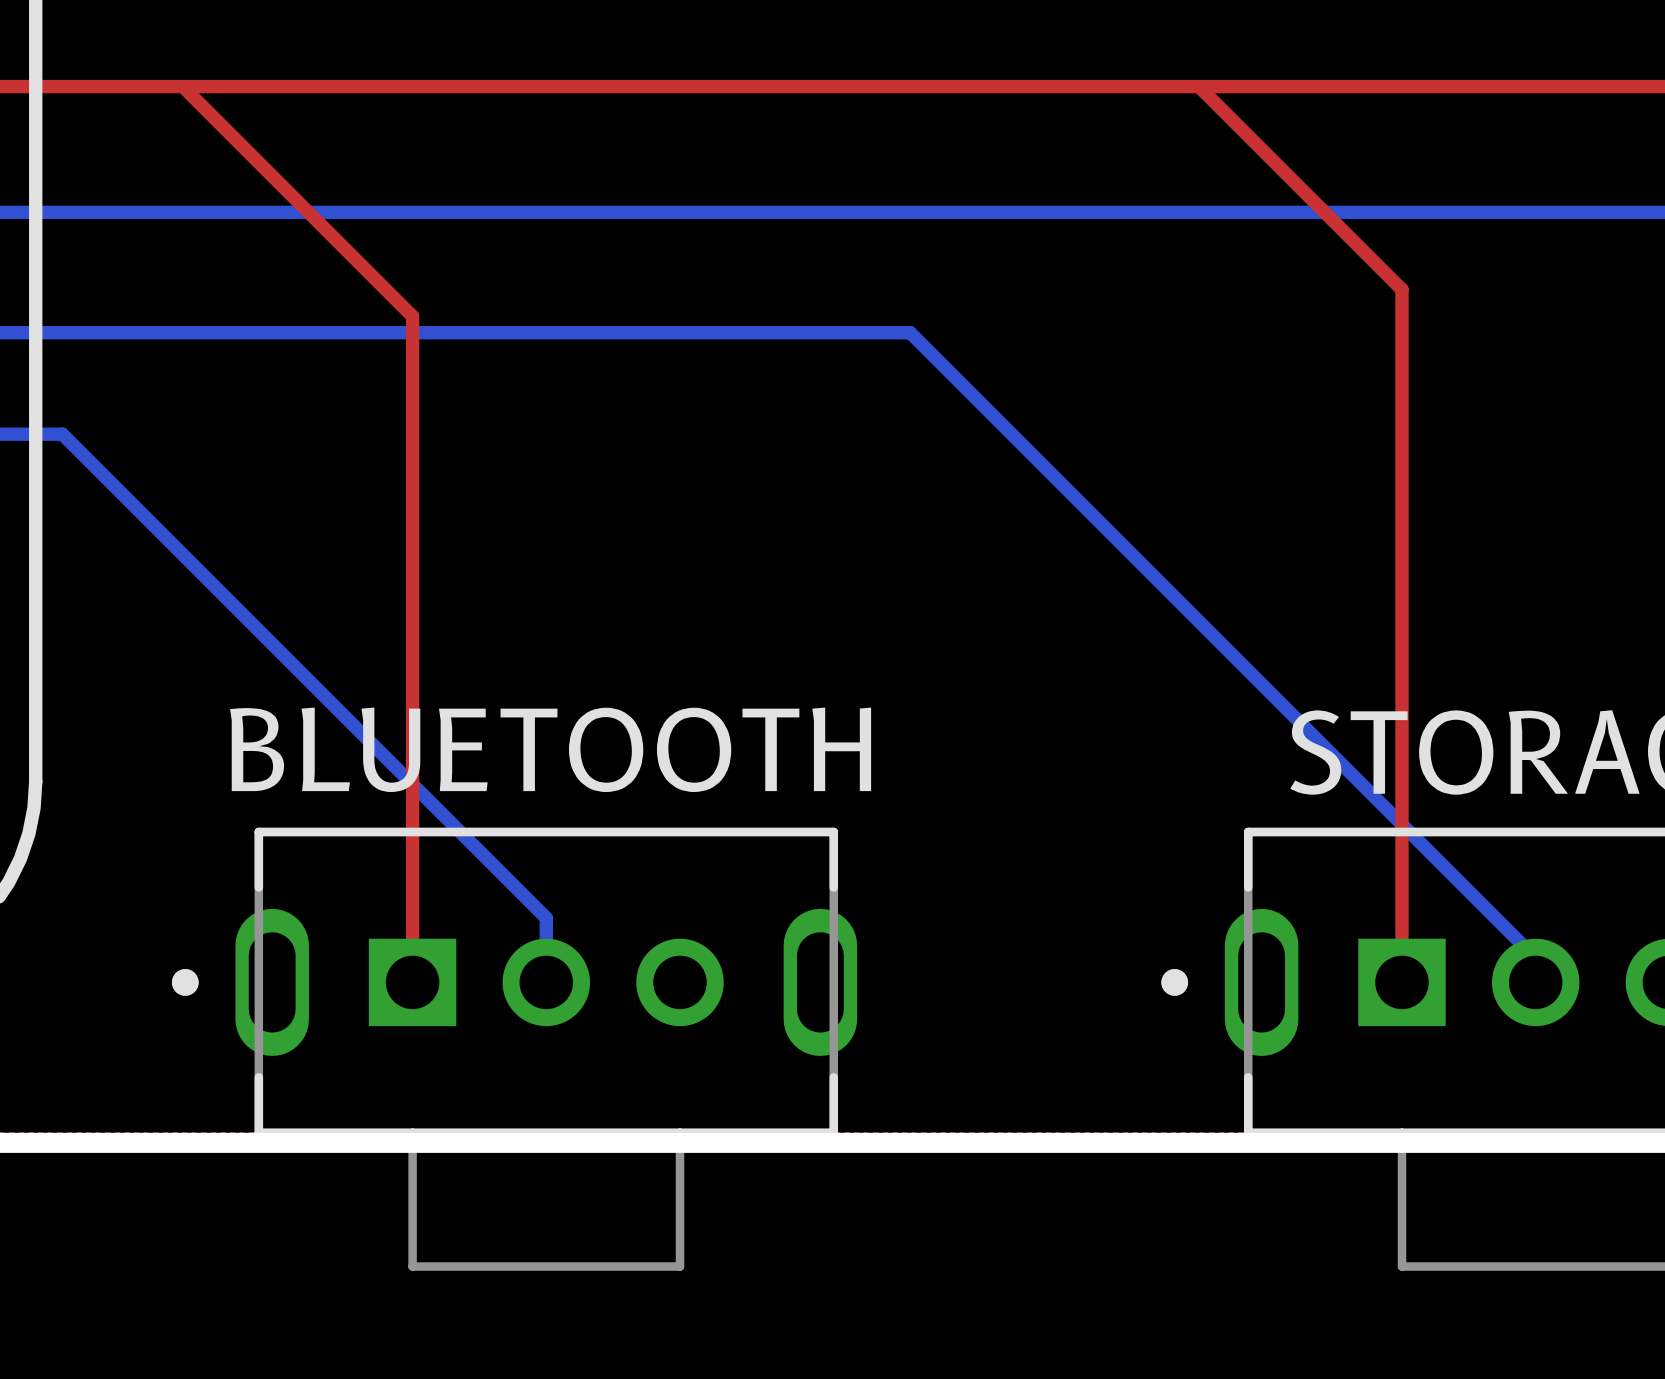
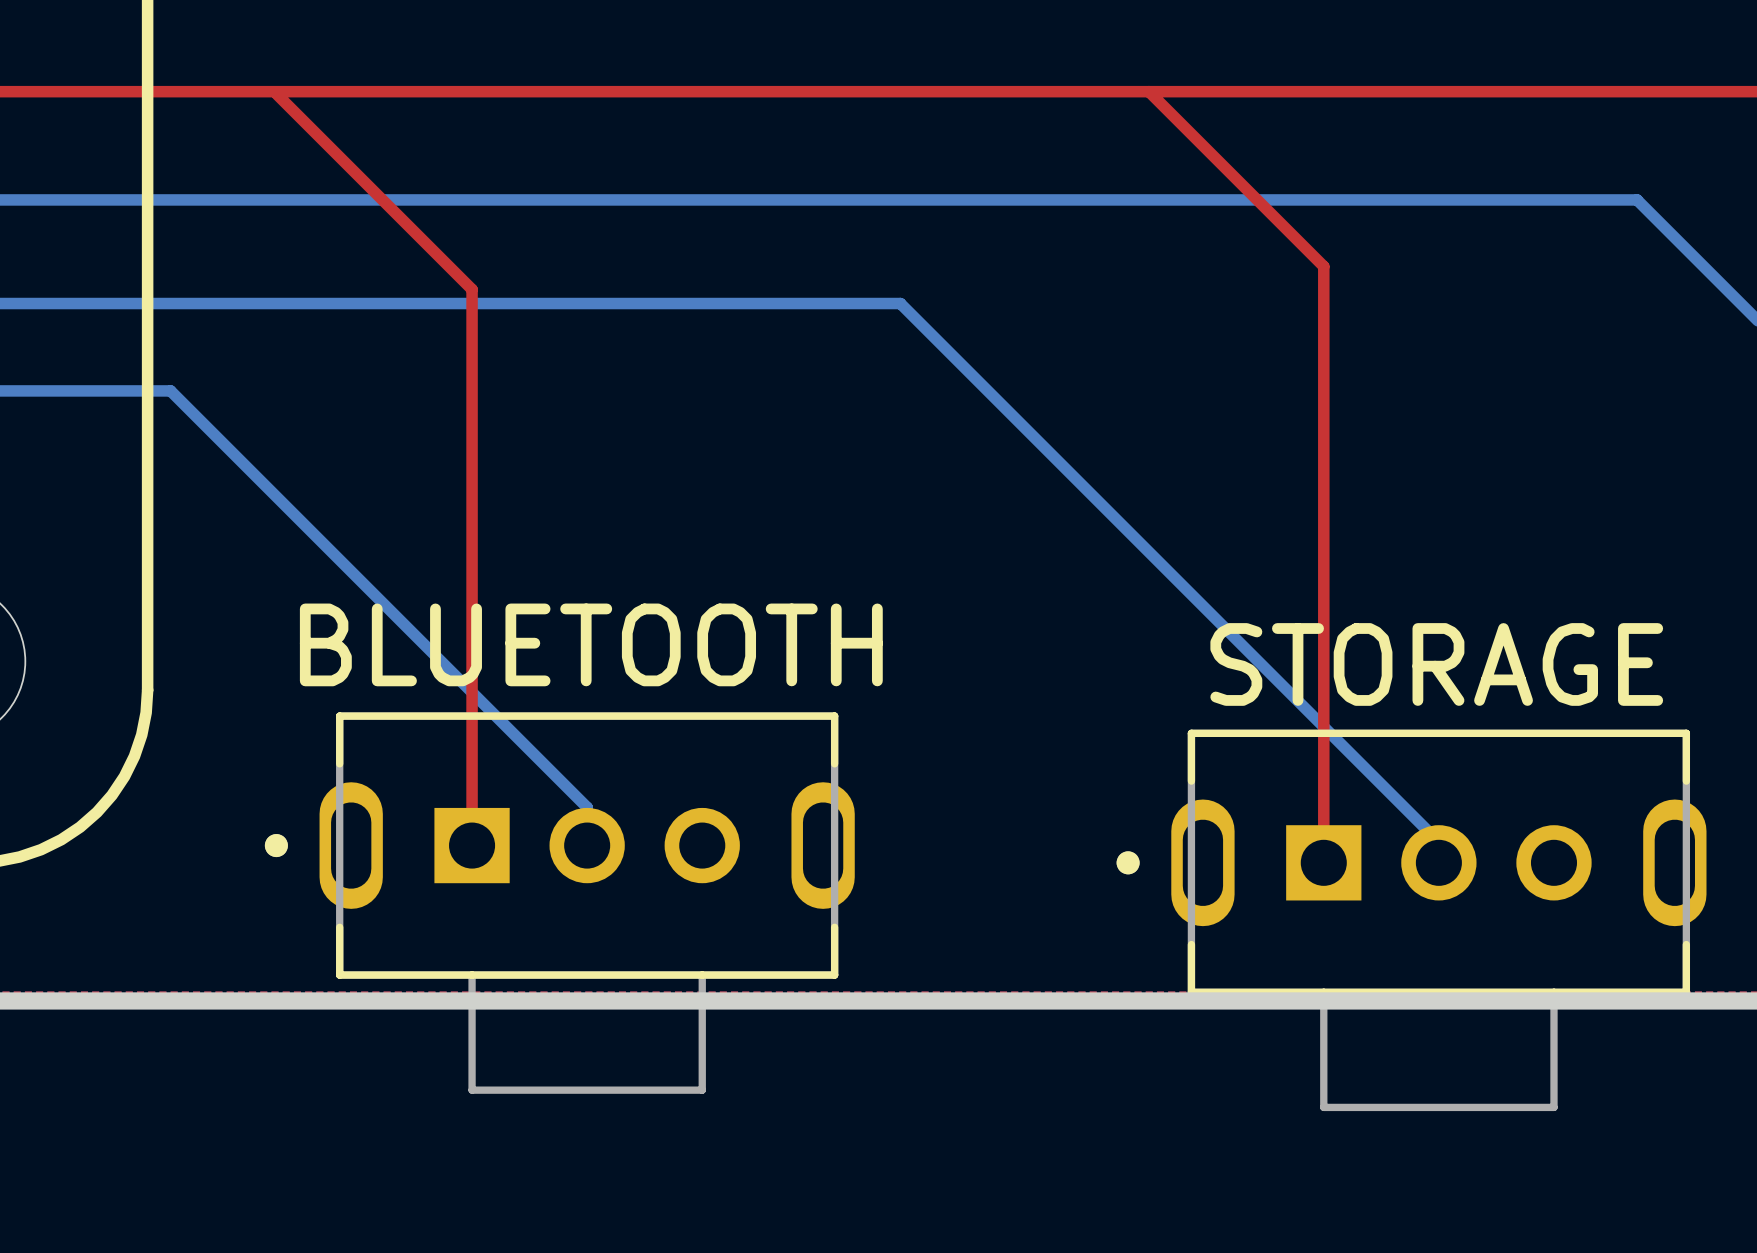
BLUETOOTH position: (514, 1049) -> (559, 903)

